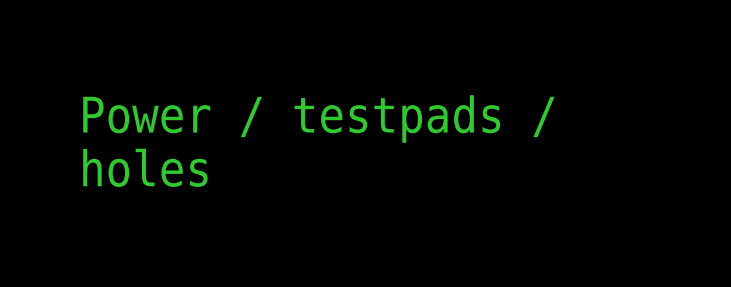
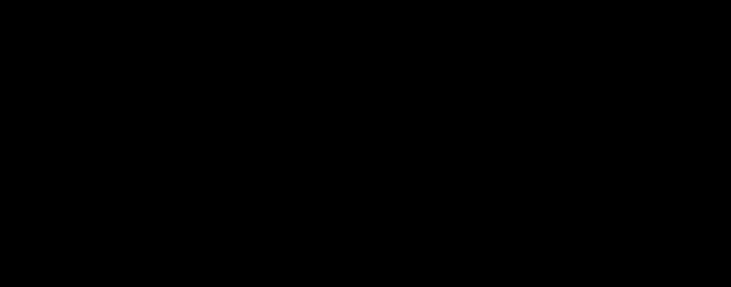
text: Power / testpads / (318, 119) -> none
text: holes (145, 167) -> none

